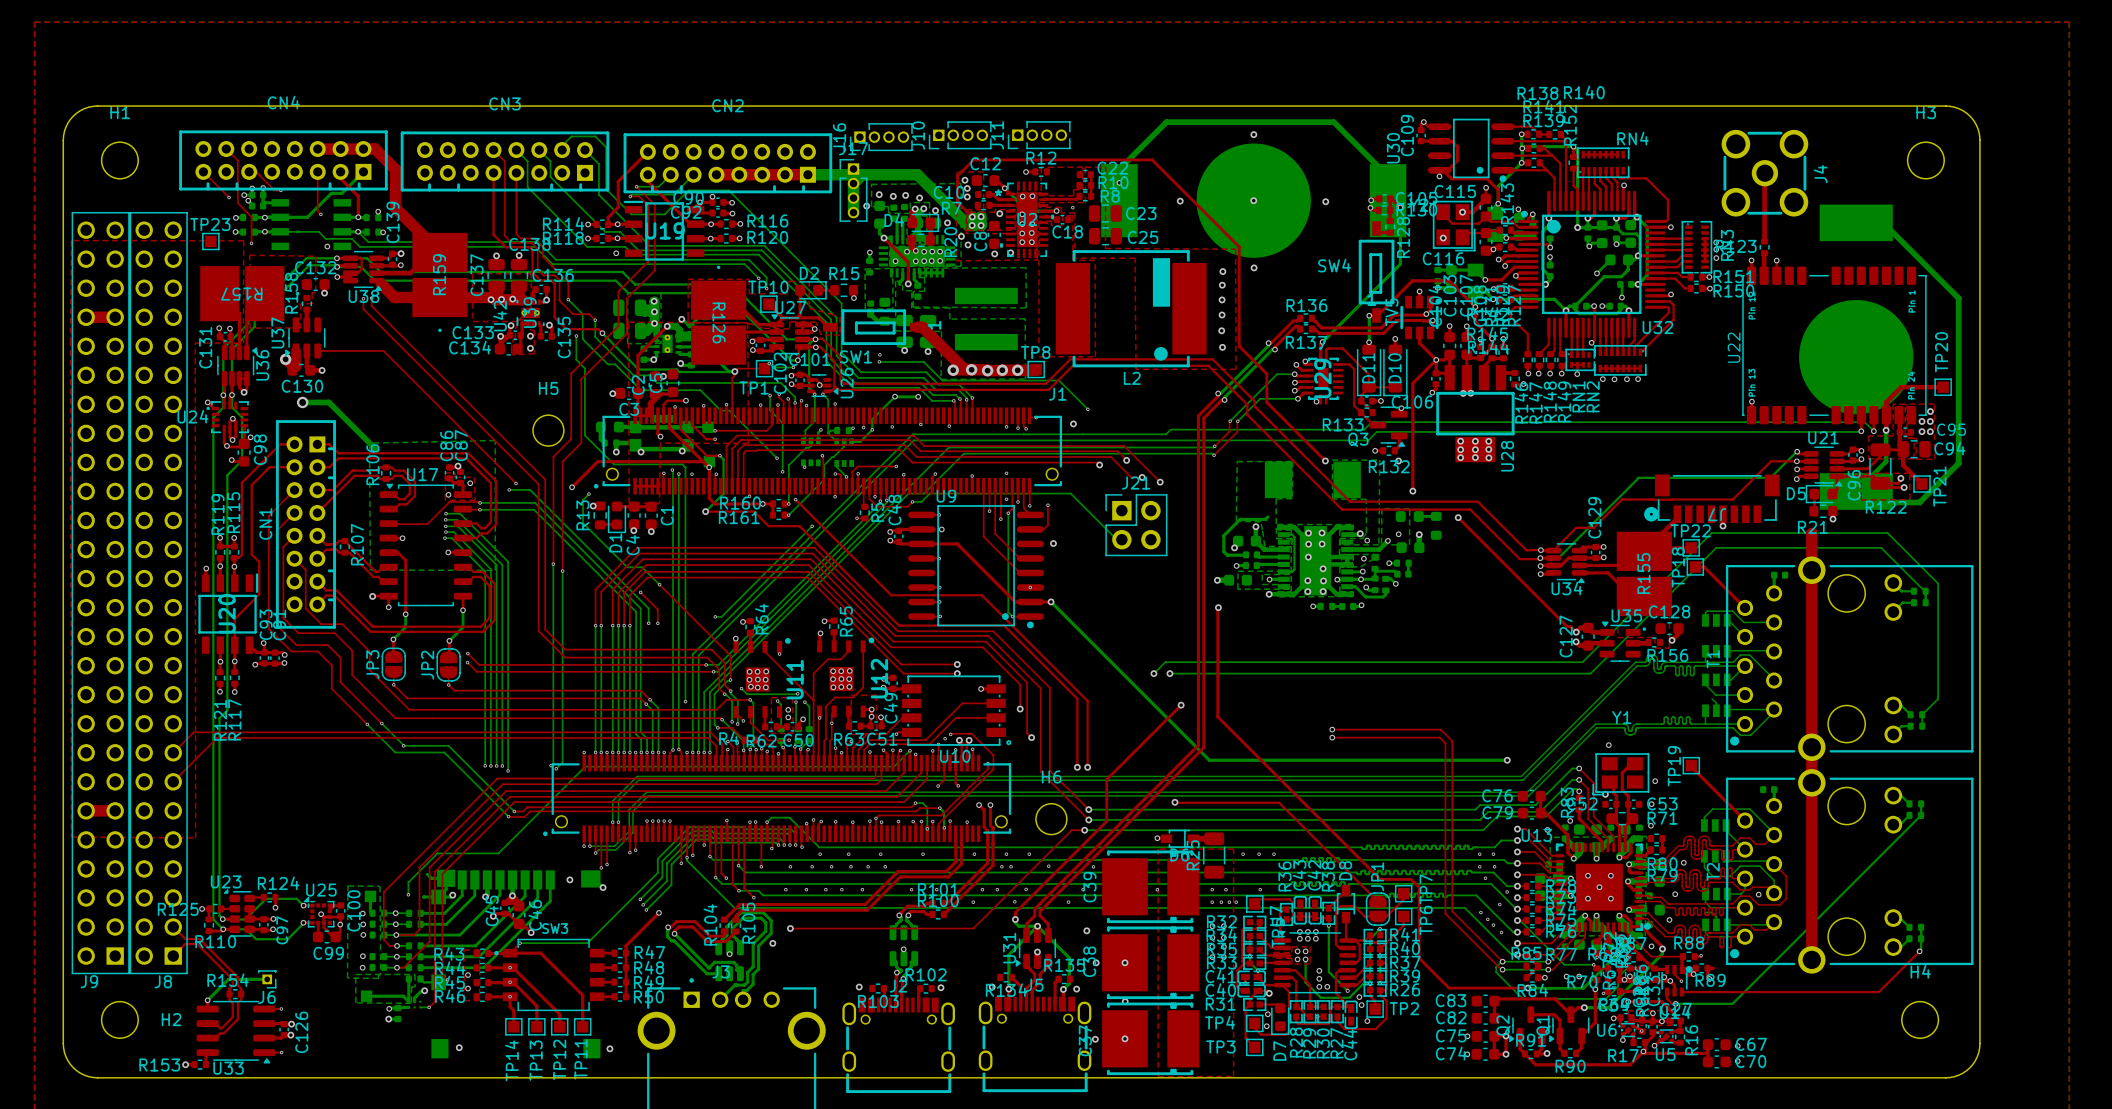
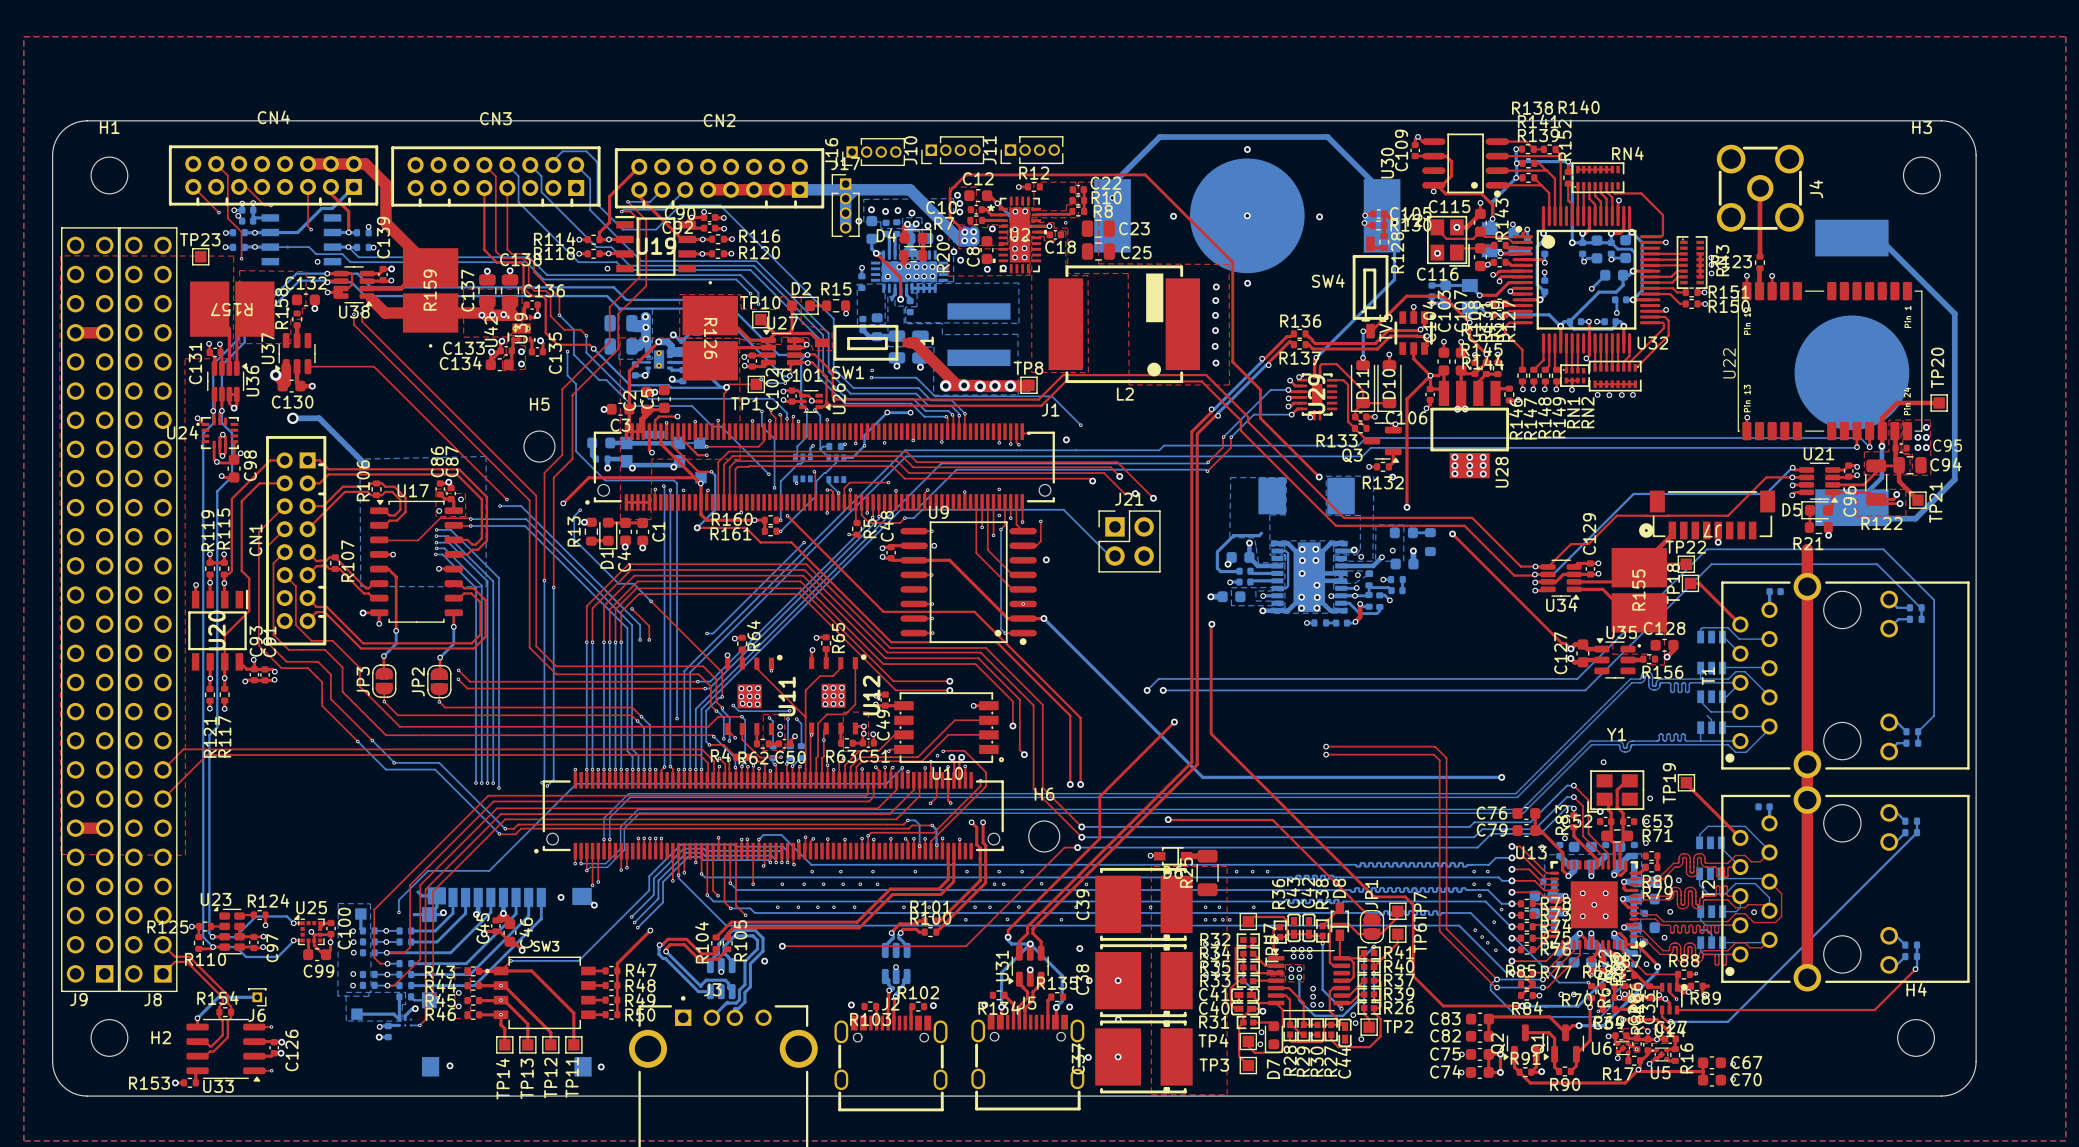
top track: none -> (1360, 603) (1360, 617) (1355, 621)

